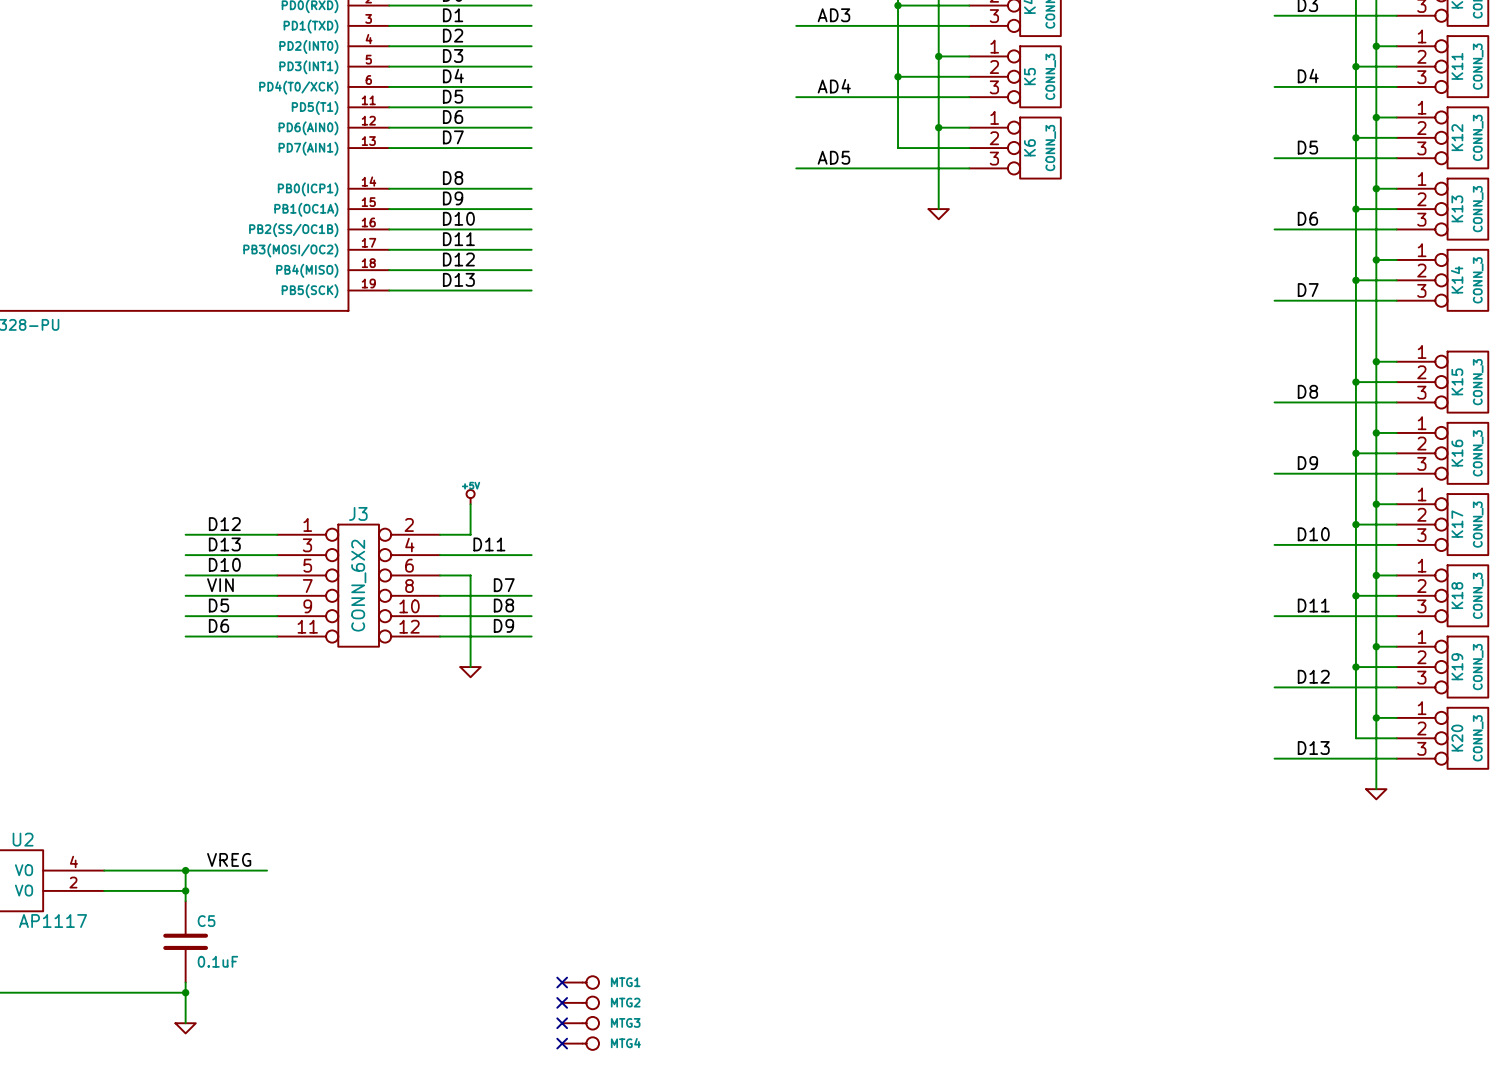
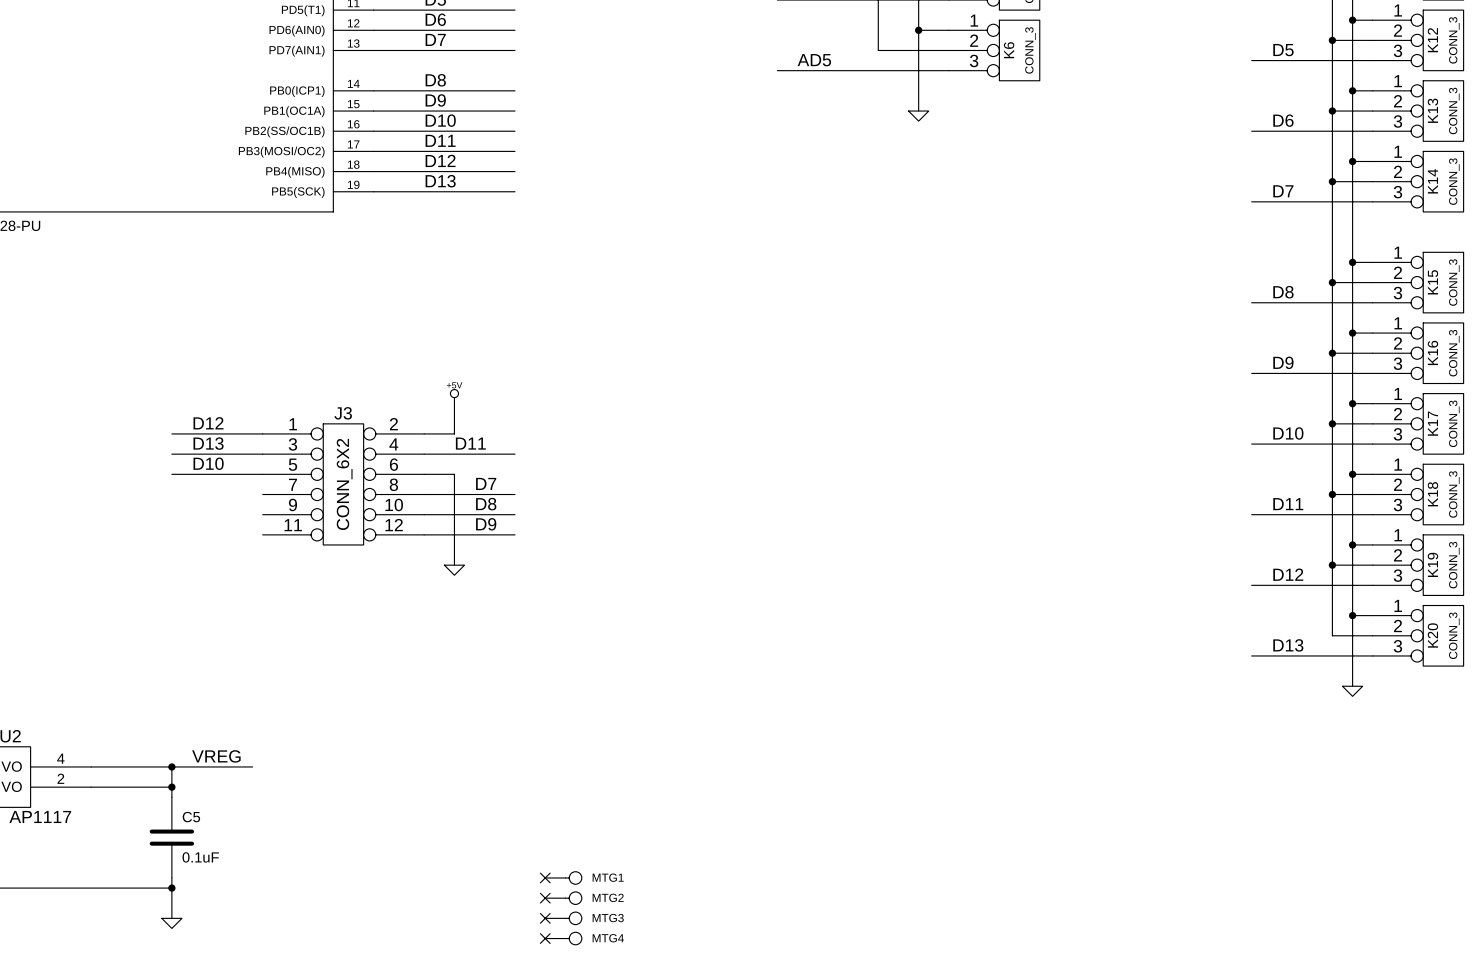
label: VIN (220, 585) -> none
wire: (185, 595) (277, 595) -> none
label: D5 (219, 605) -> none
wire: (185, 616) (277, 616) -> none
label: D6 (219, 625) -> none
wire: (185, 636) (277, 636) -> none

